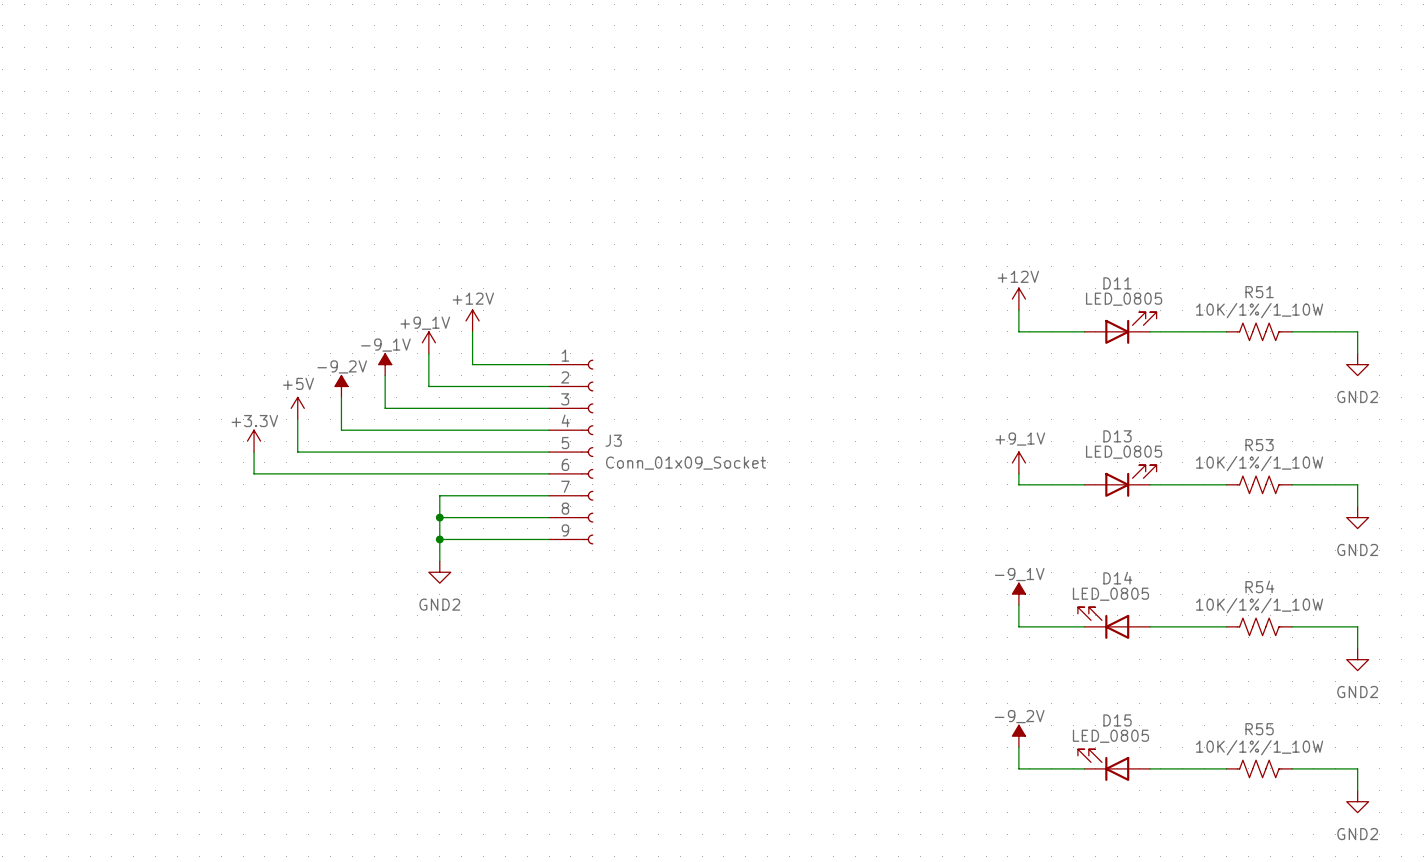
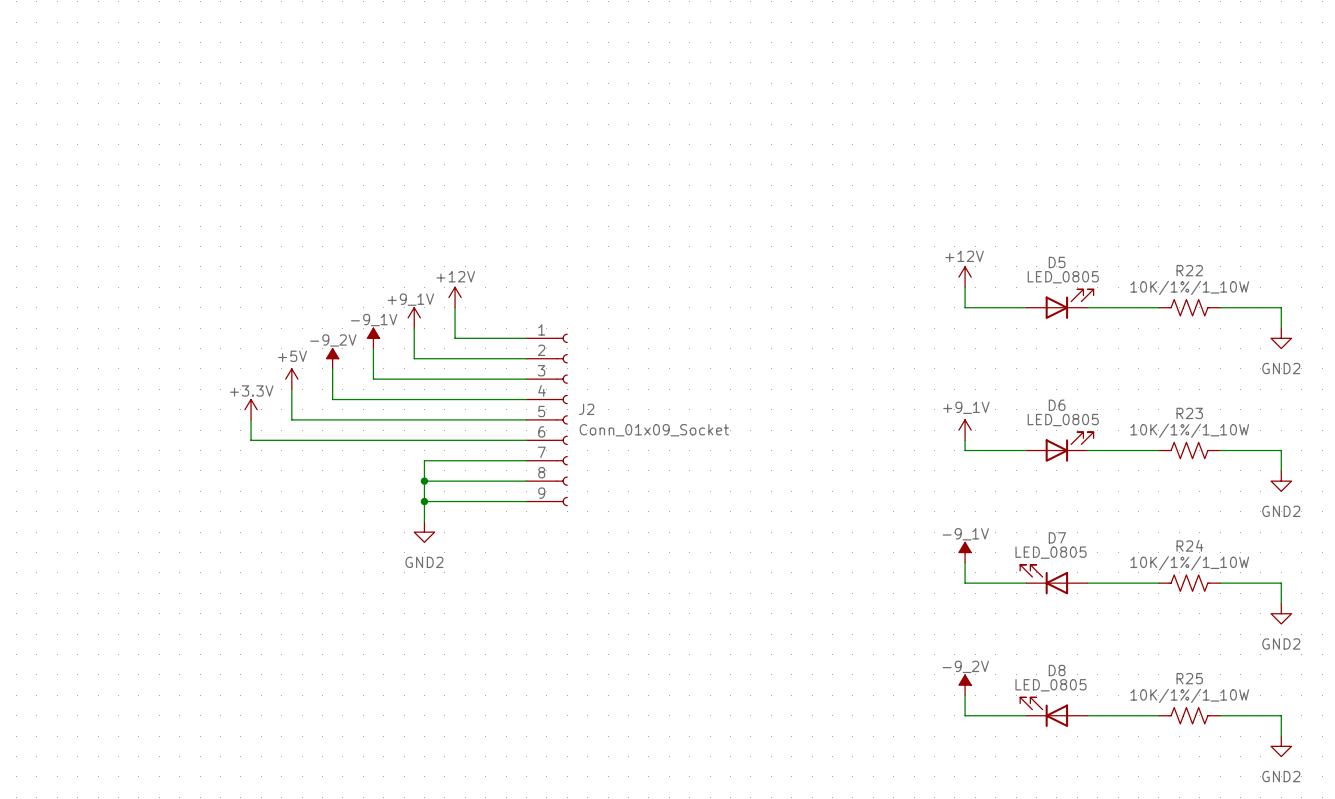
D11 name: D11 (1117, 283) -> D5 (1057, 262)
R51 name: R51 (1259, 292) -> R22 (1189, 270)
D13 name: D13 (1117, 436) -> D6 (1057, 405)
J3 name: J3 (613, 440) -> J2 (586, 409)
R53 name: R53 (1259, 445) -> R23 (1189, 413)
D14 name: D14 (1117, 578) -> D7 (1057, 537)
R54 name: R54 (1259, 586) -> R24 (1189, 545)
D15 name: D15 (1117, 720) -> D8 (1057, 670)
R55 name: R55 (1259, 729) -> R25 (1189, 678)

